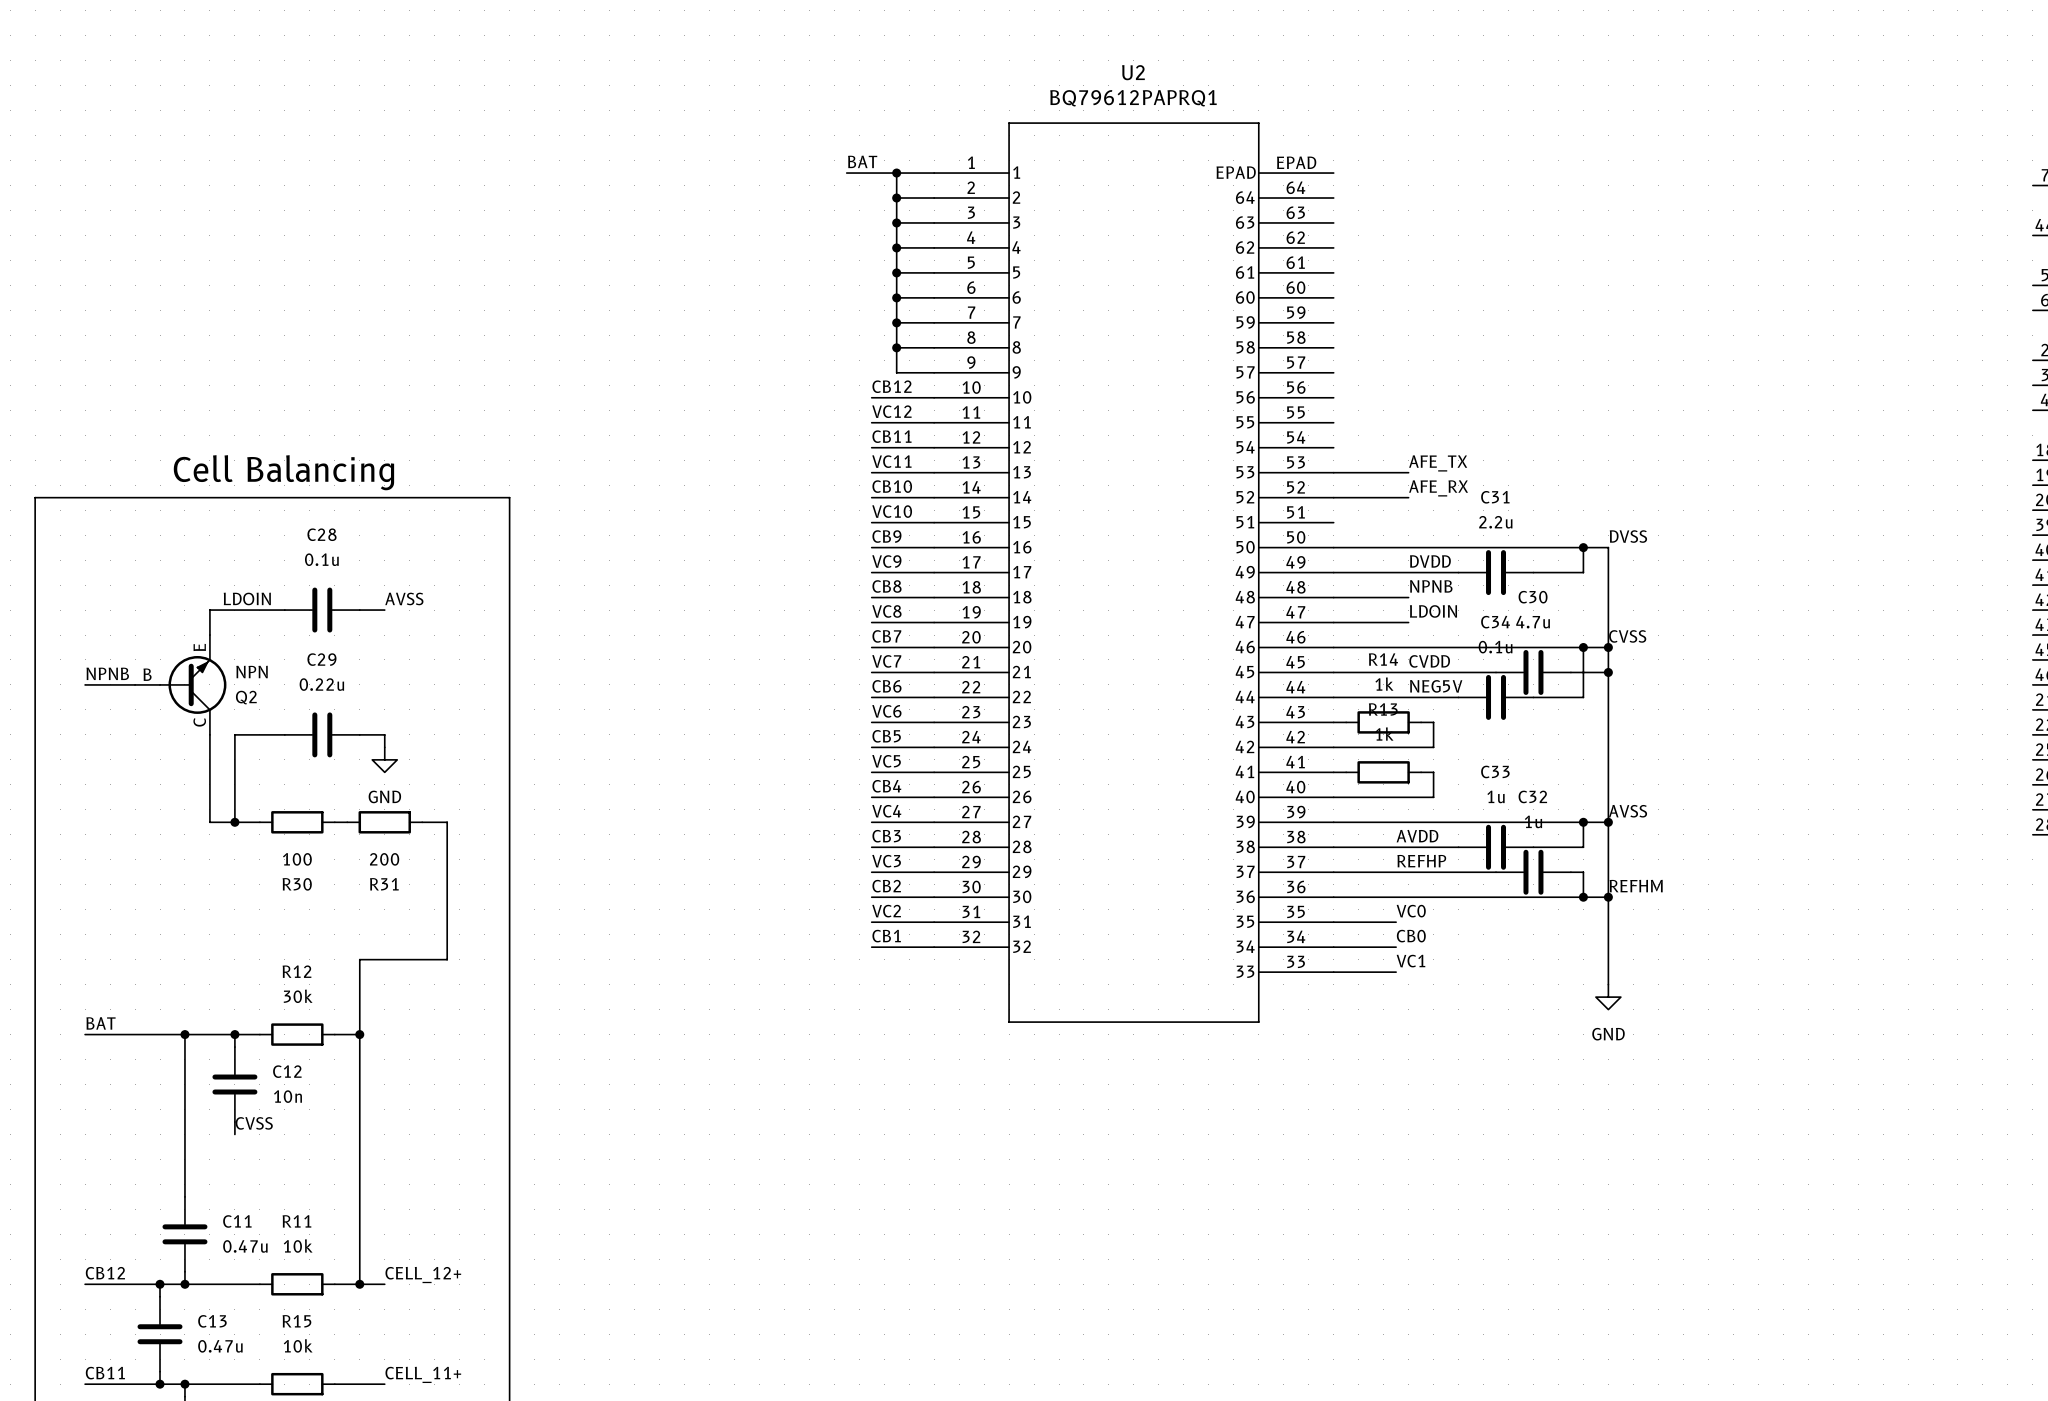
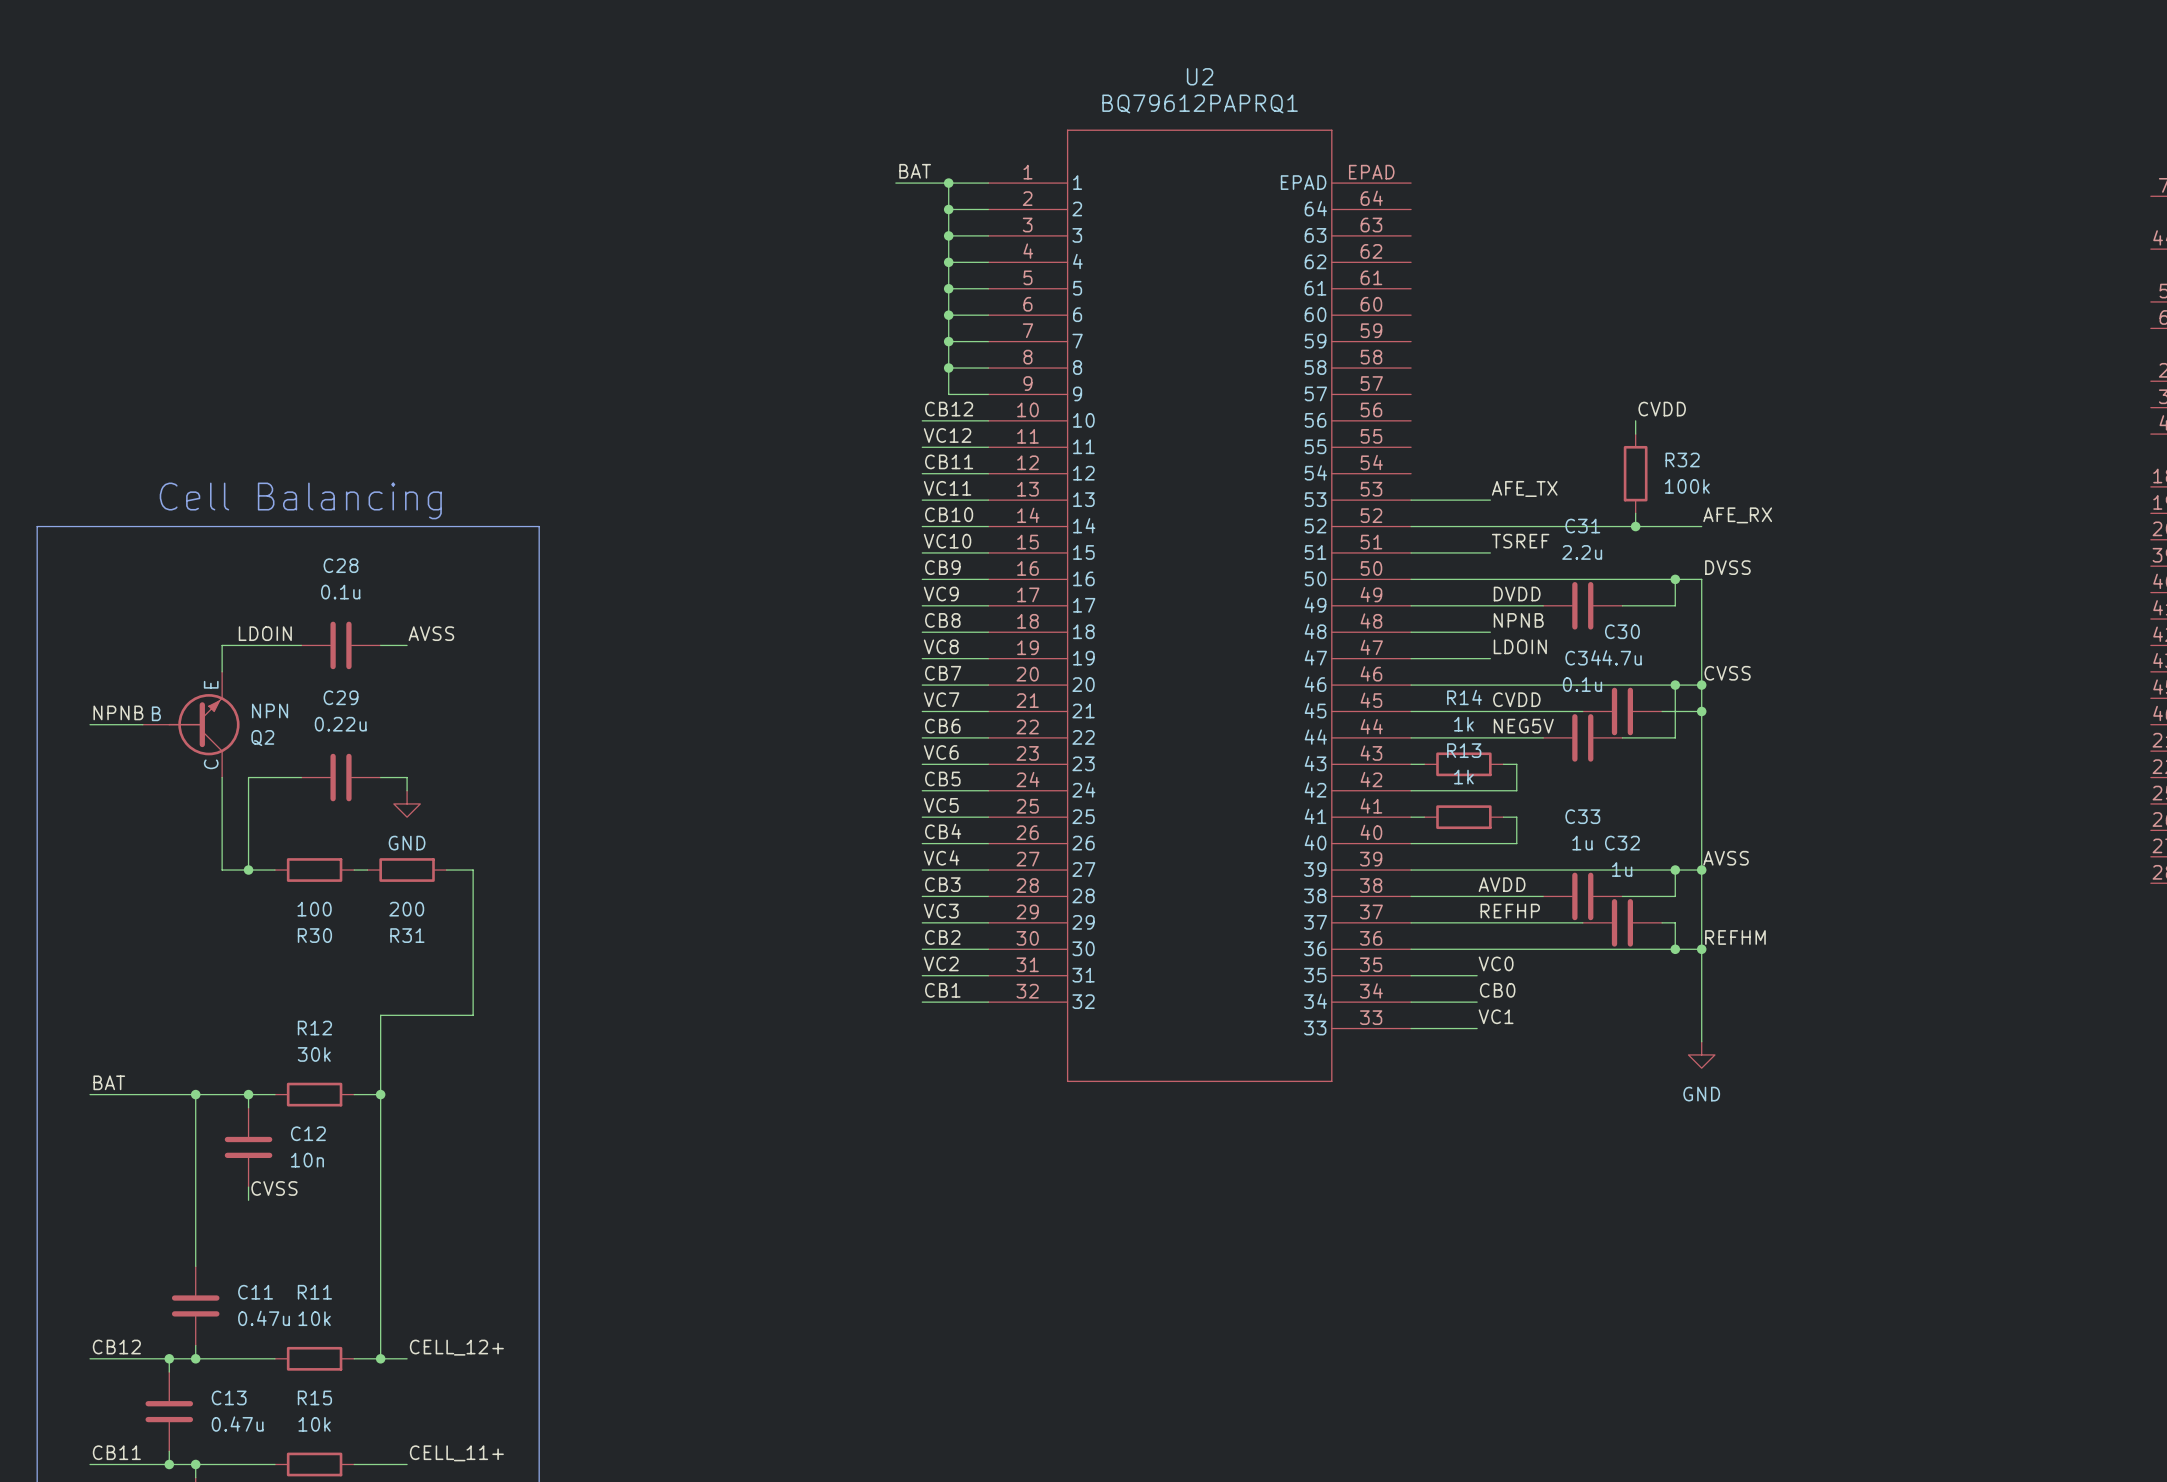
label: none -> CVDD (1662, 409)
wire: none -> (1635, 420) (1635, 434)
R32: none -> 100k (1635, 473)
wire: none -> (1635, 513) (1635, 526)
label position: AFE_RX (1438, 488) -> AFE_RX (1737, 515)
wire: none -> (1490, 526) (1701, 526)
junction: none -> (1635, 526)
label: none -> TSREF (1520, 541)
wire: none -> (1411, 552) (1490, 552)

